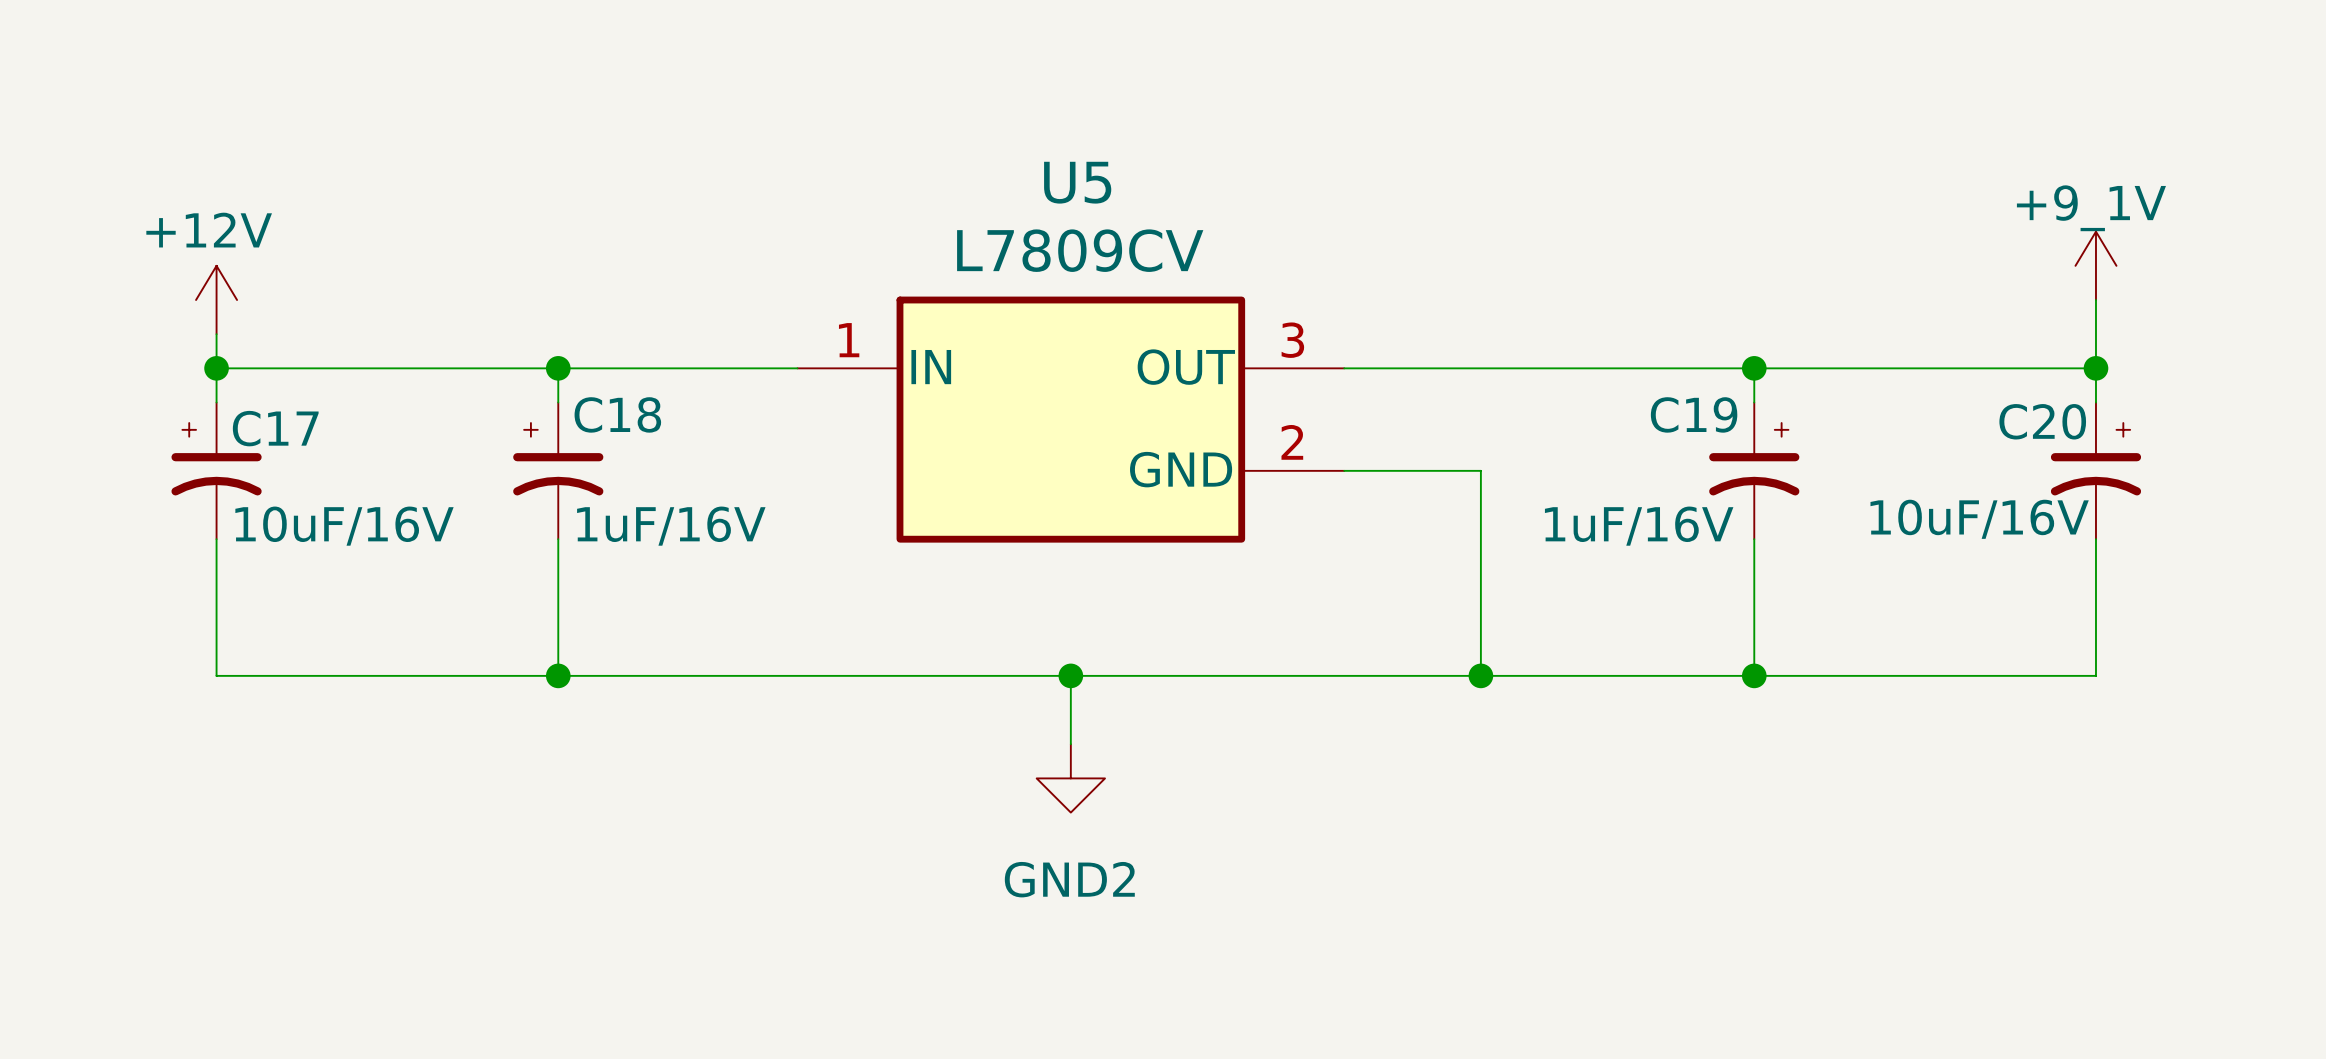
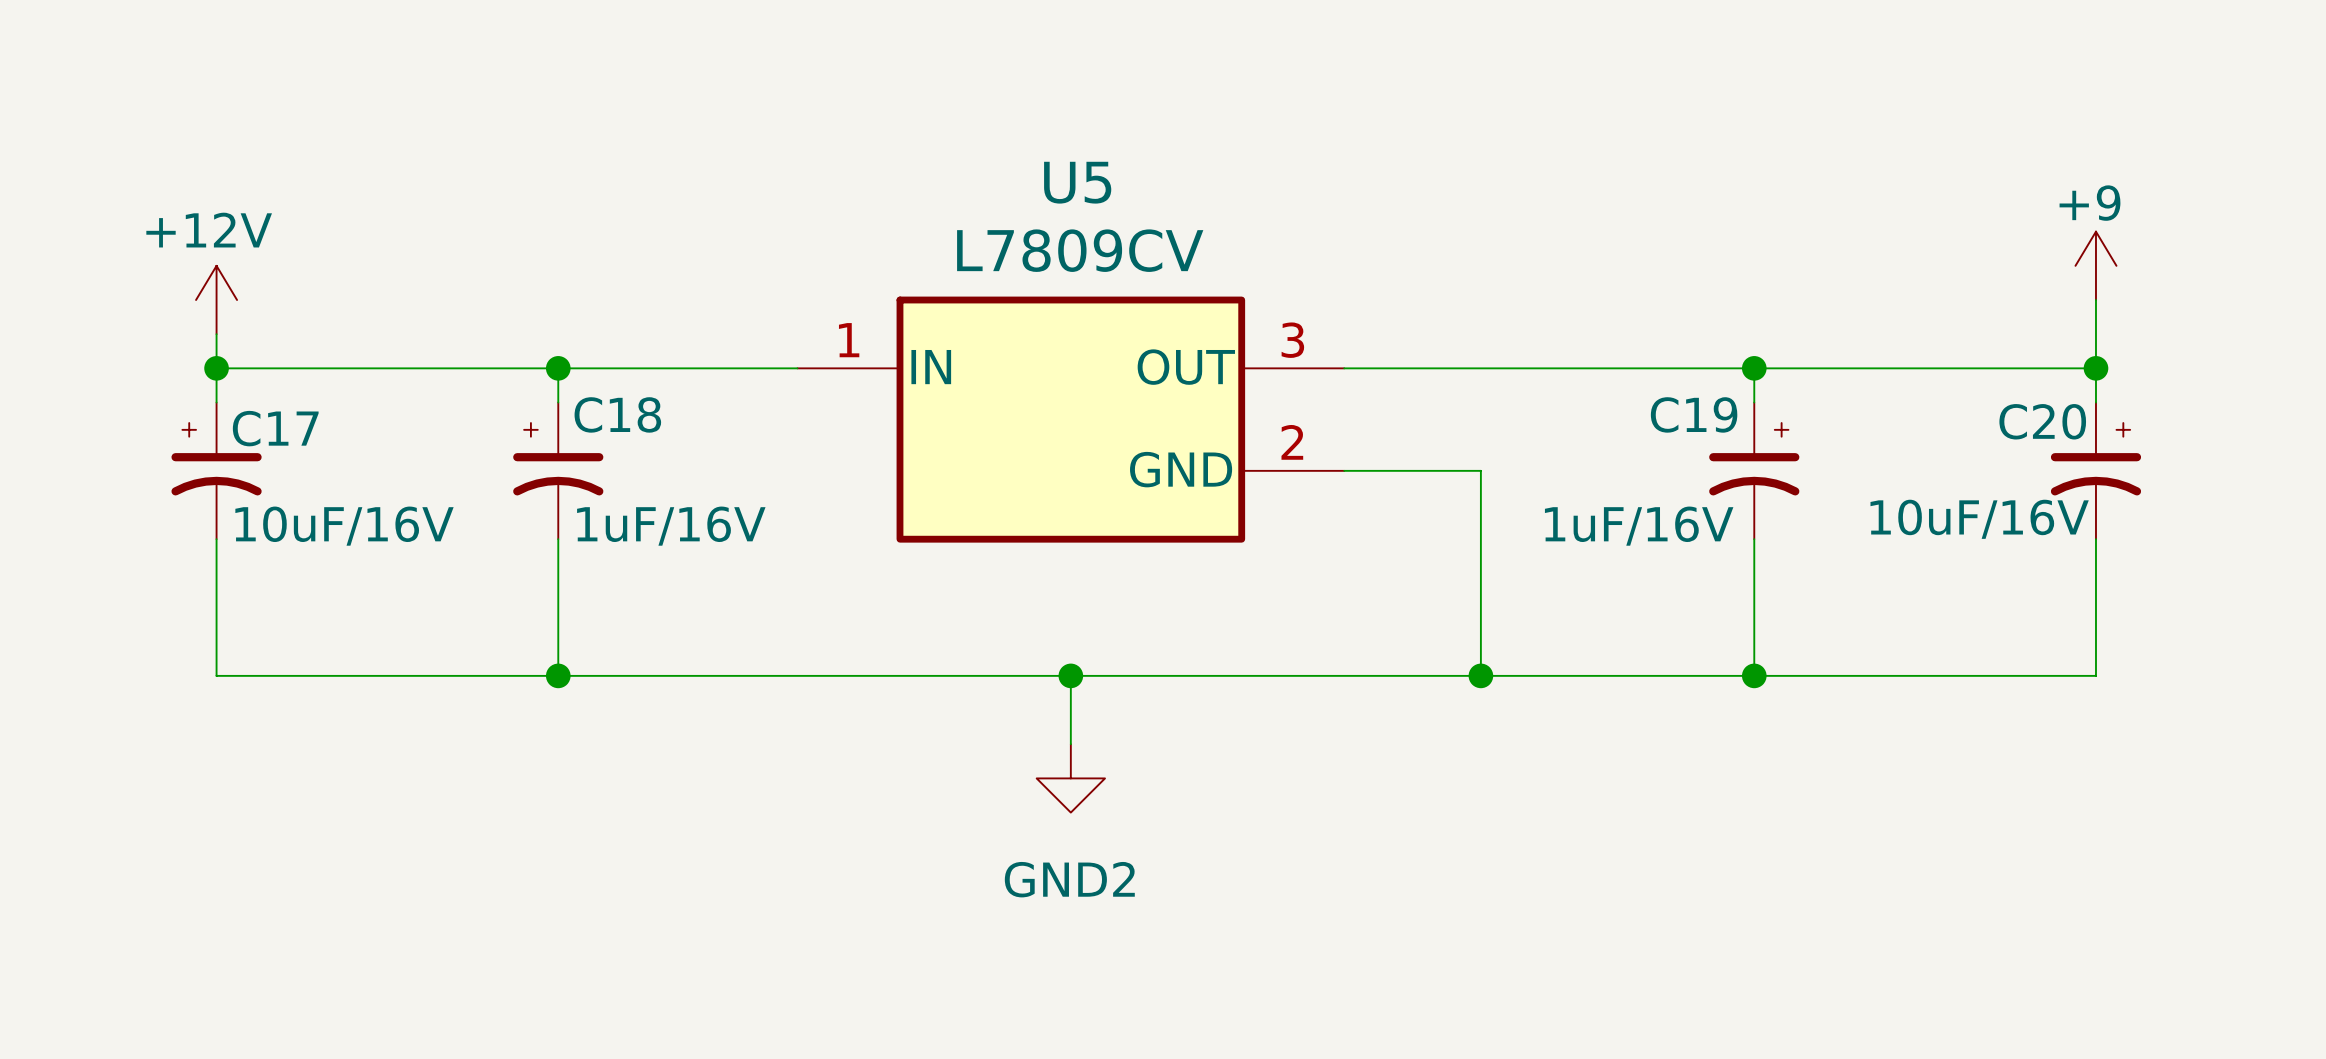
power symbol: +9_1V (2095, 265) -> +9 (2095, 265)

